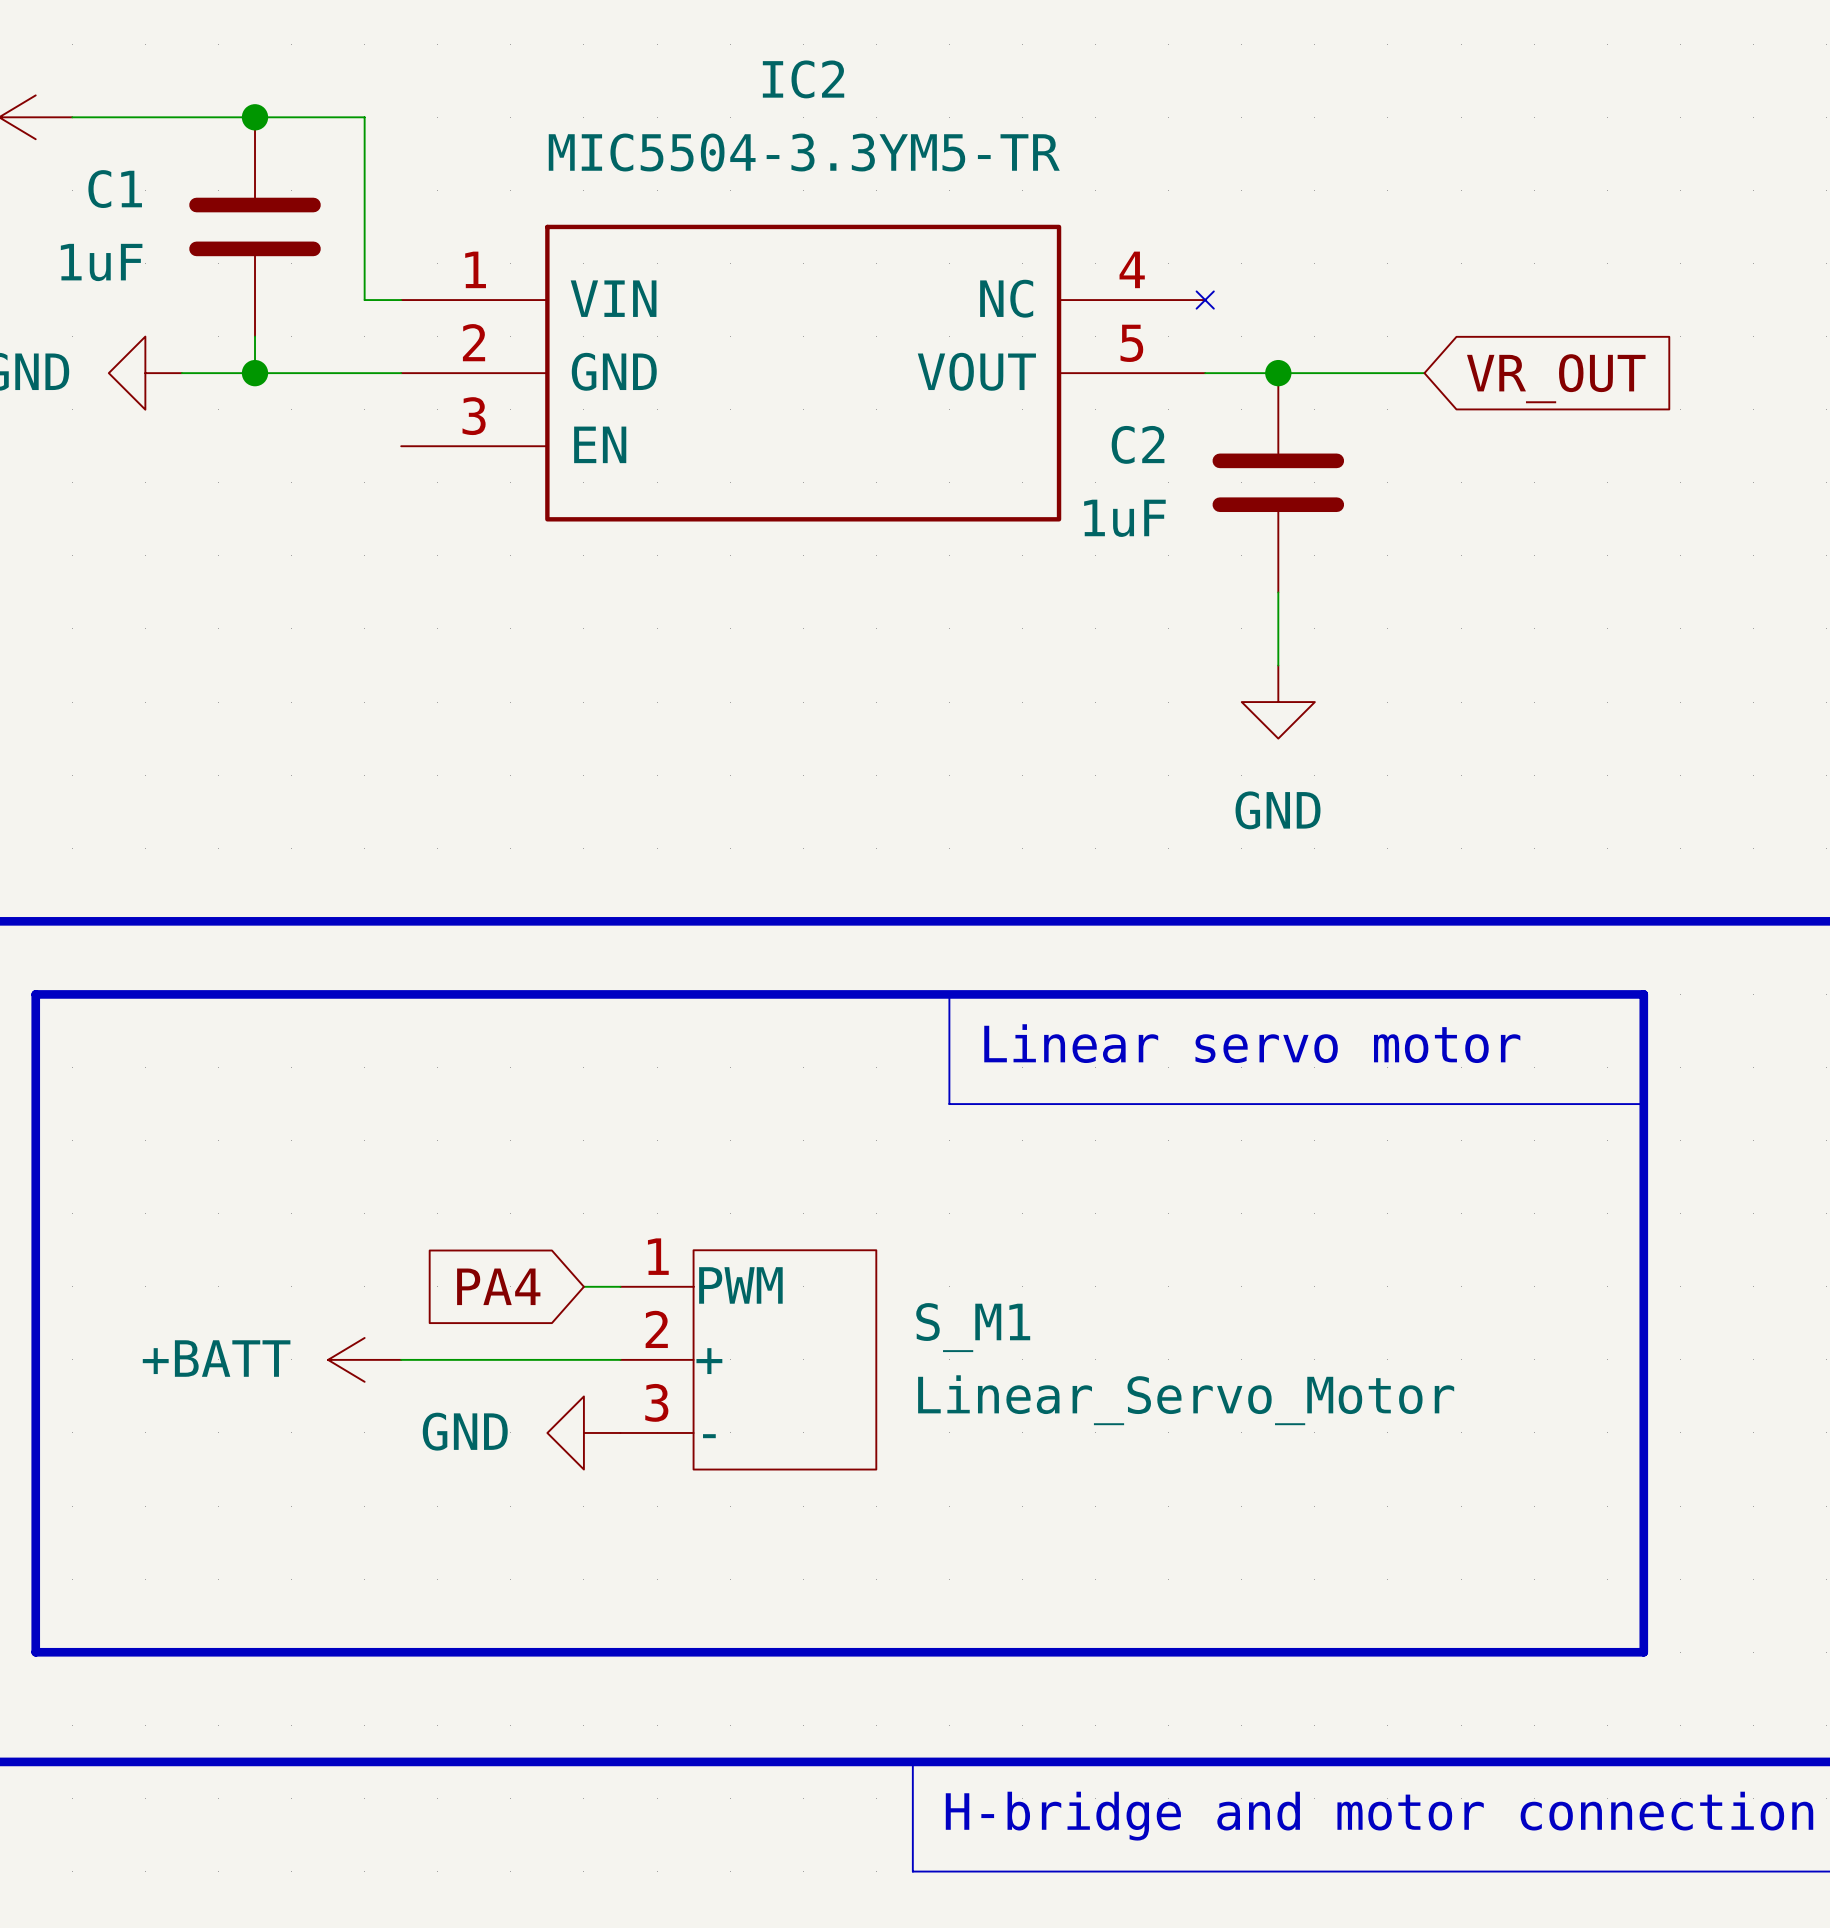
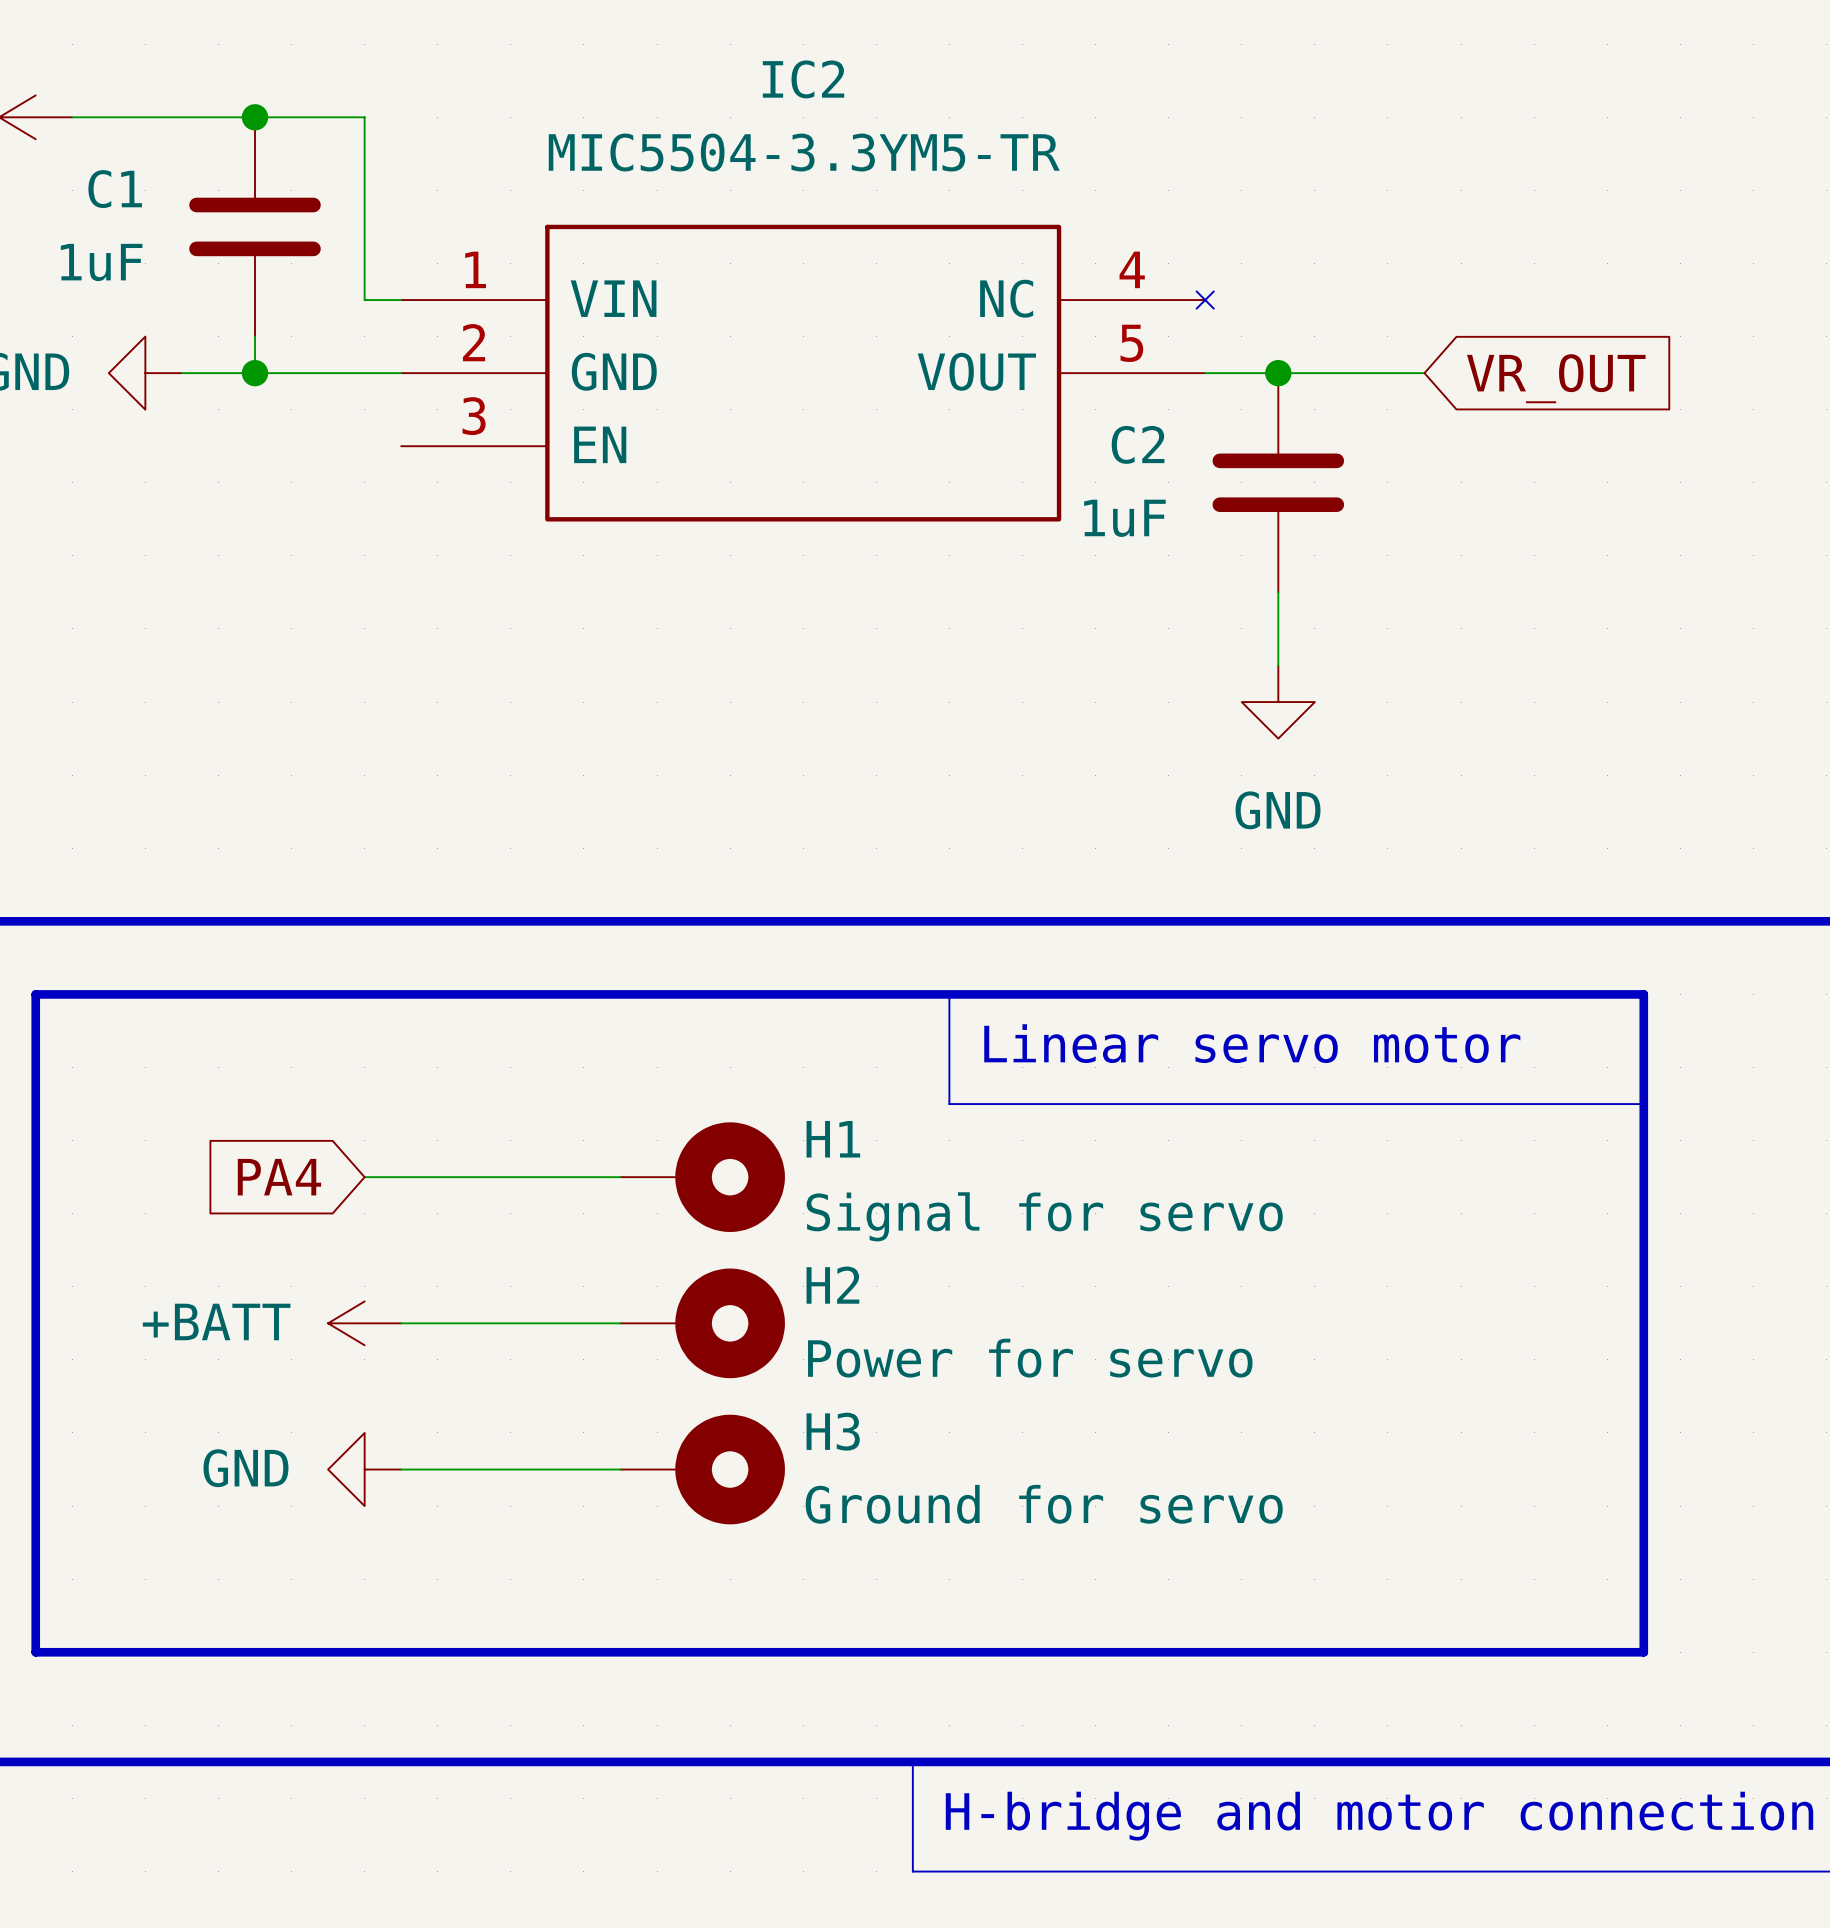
wire: none -> (364, 1177) (620, 1177)
H1: none -> Signal for servo (702, 1177)
global label position: PA4 (498, 1286) -> PA4 (279, 1177)
wire: (583, 1286) (620, 1286) -> none
H2: none -> Power for servo (702, 1323)
power symbol position: +BATT (364, 1359) -> +BATT (364, 1323)
wire: (401, 1359) (620, 1359) -> (401, 1323) (620, 1323)
S_M1: Linear_Servo_Motor (748, 1359) -> none
power symbol position: GND (583, 1432) -> GND (364, 1469)
wire: none -> (401, 1469) (620, 1469)
H3: none -> Ground for servo (702, 1469)

